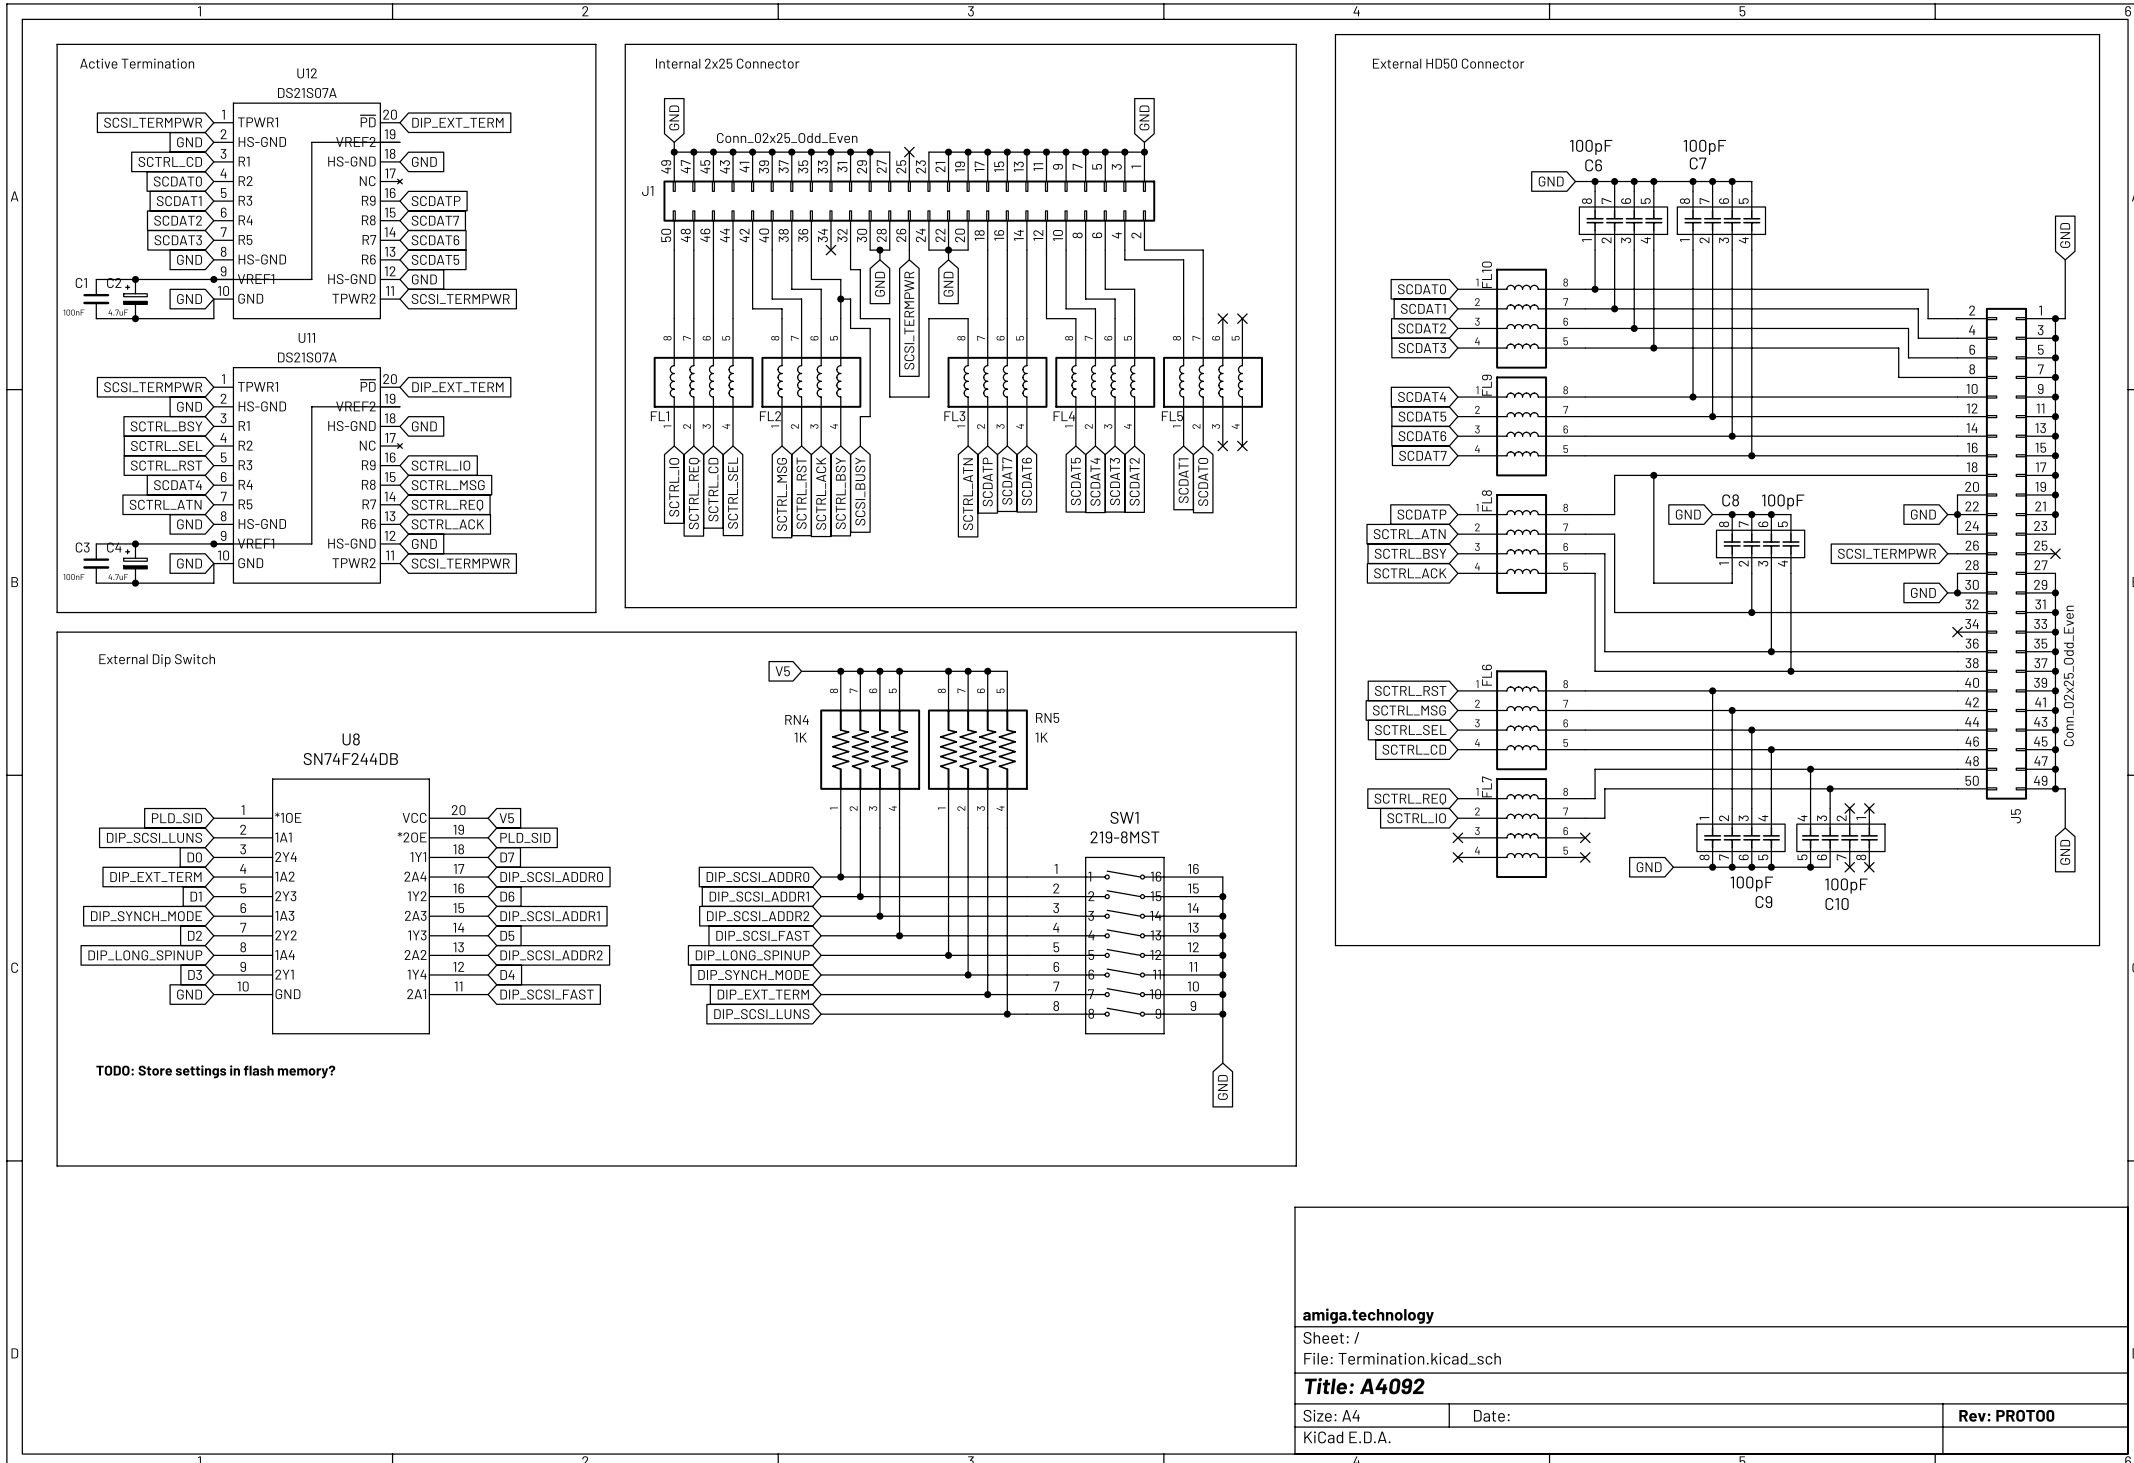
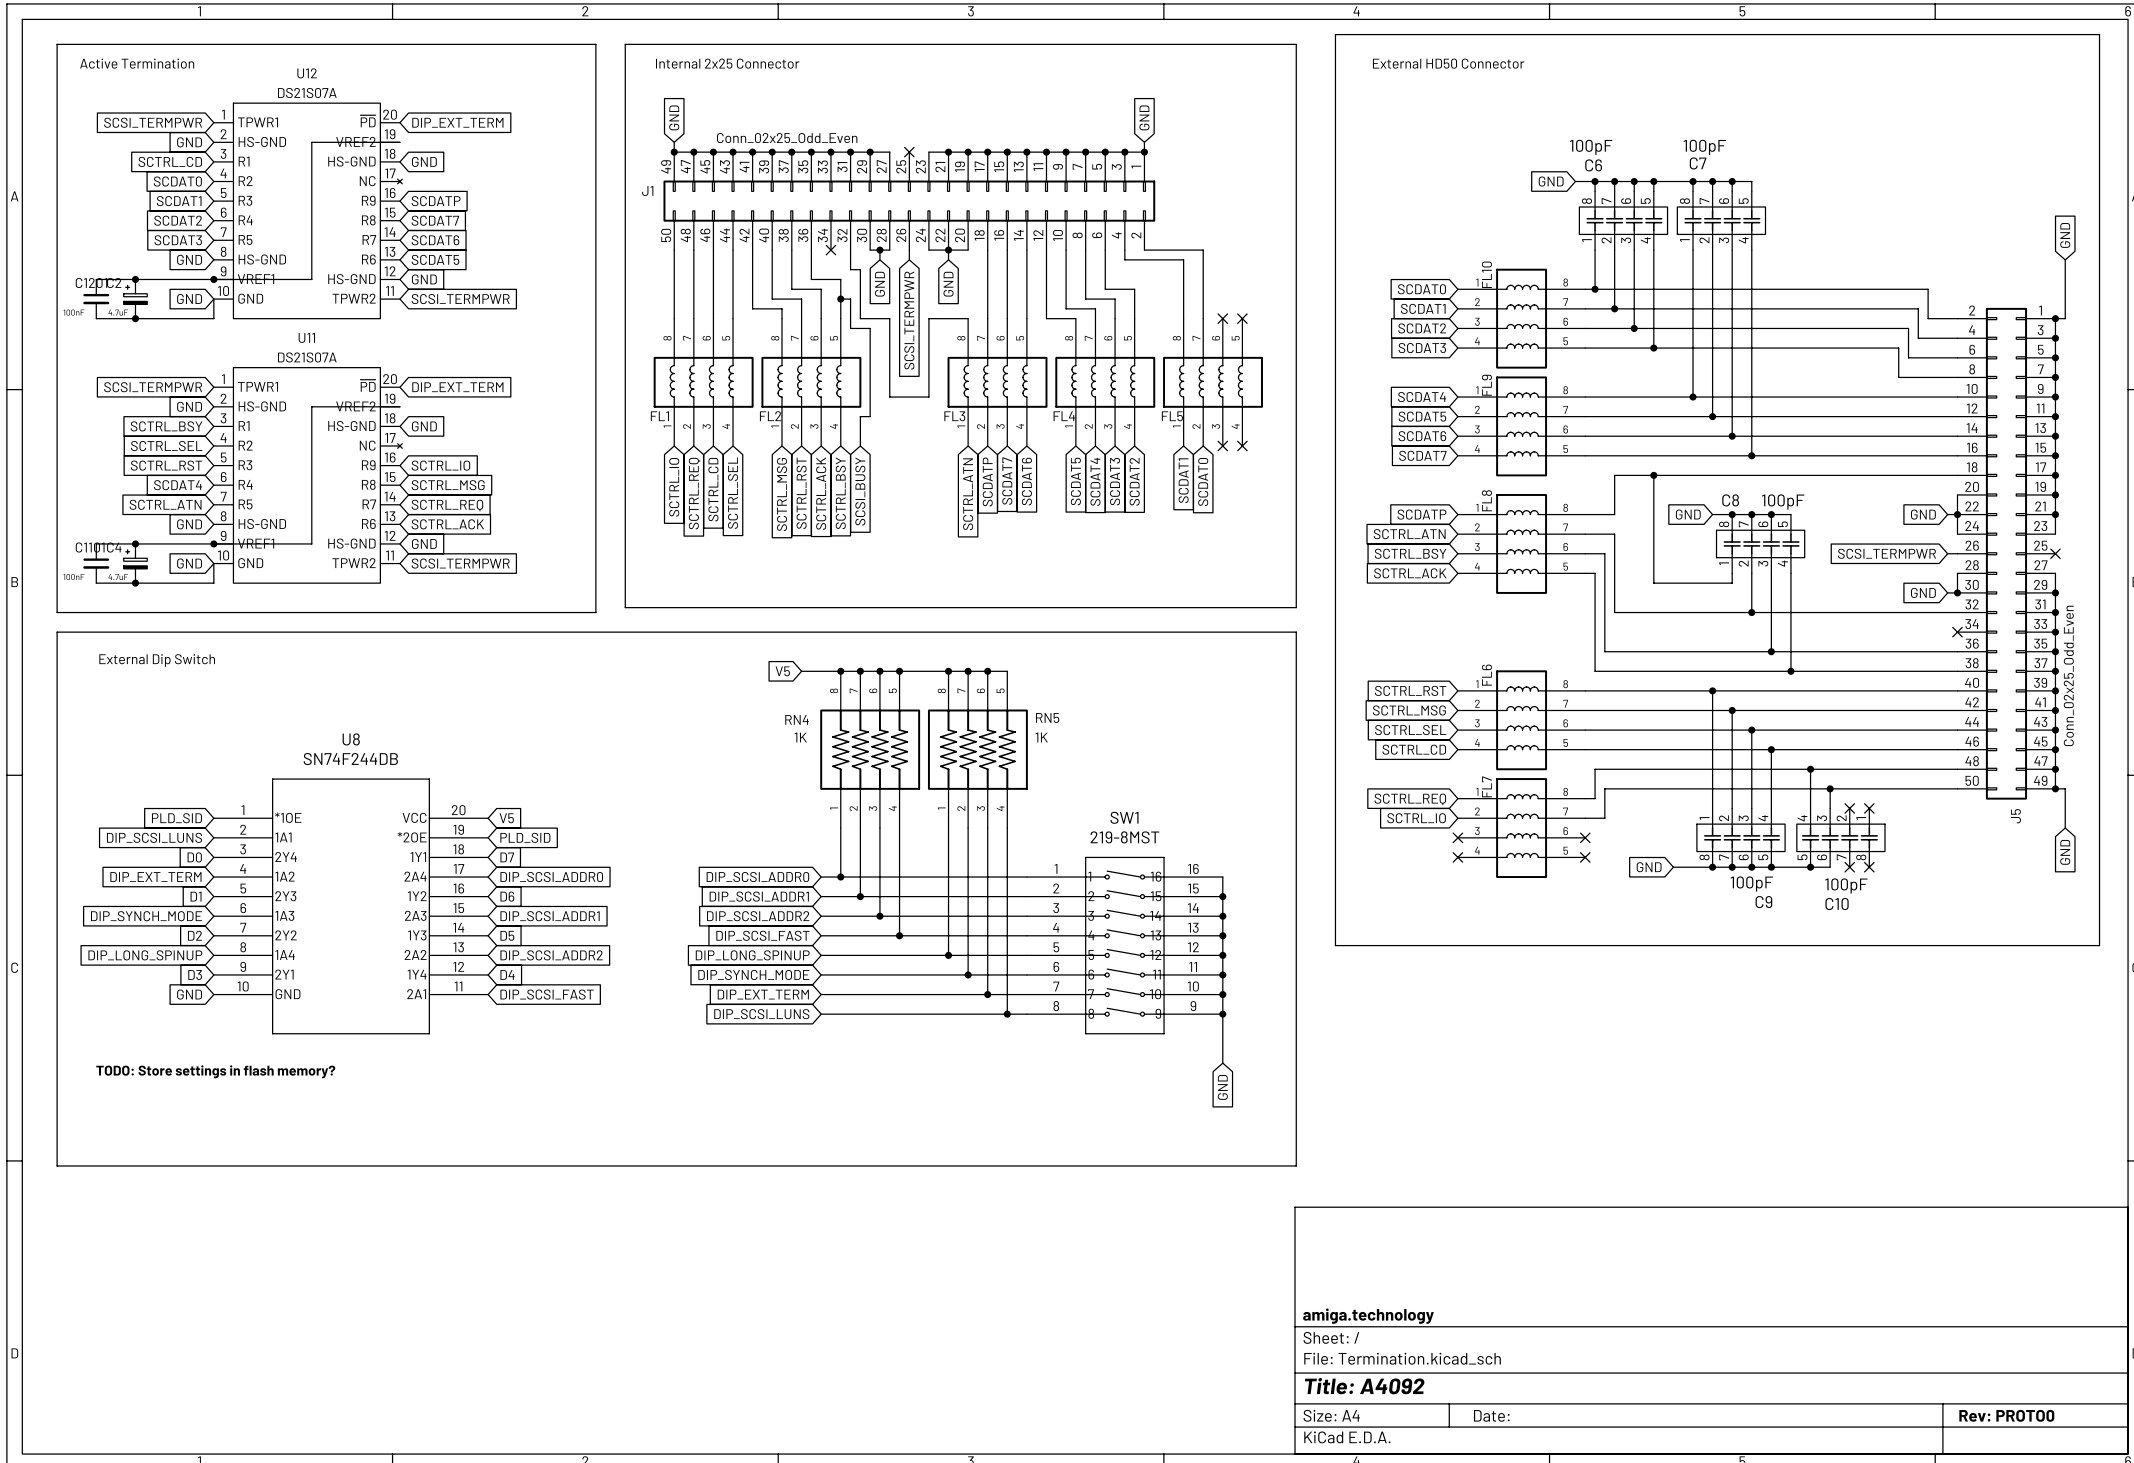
C1 name: C1 (81, 283) -> C1201 (91, 283)
C3 name: C3 (82, 547) -> C1101 (90, 547)

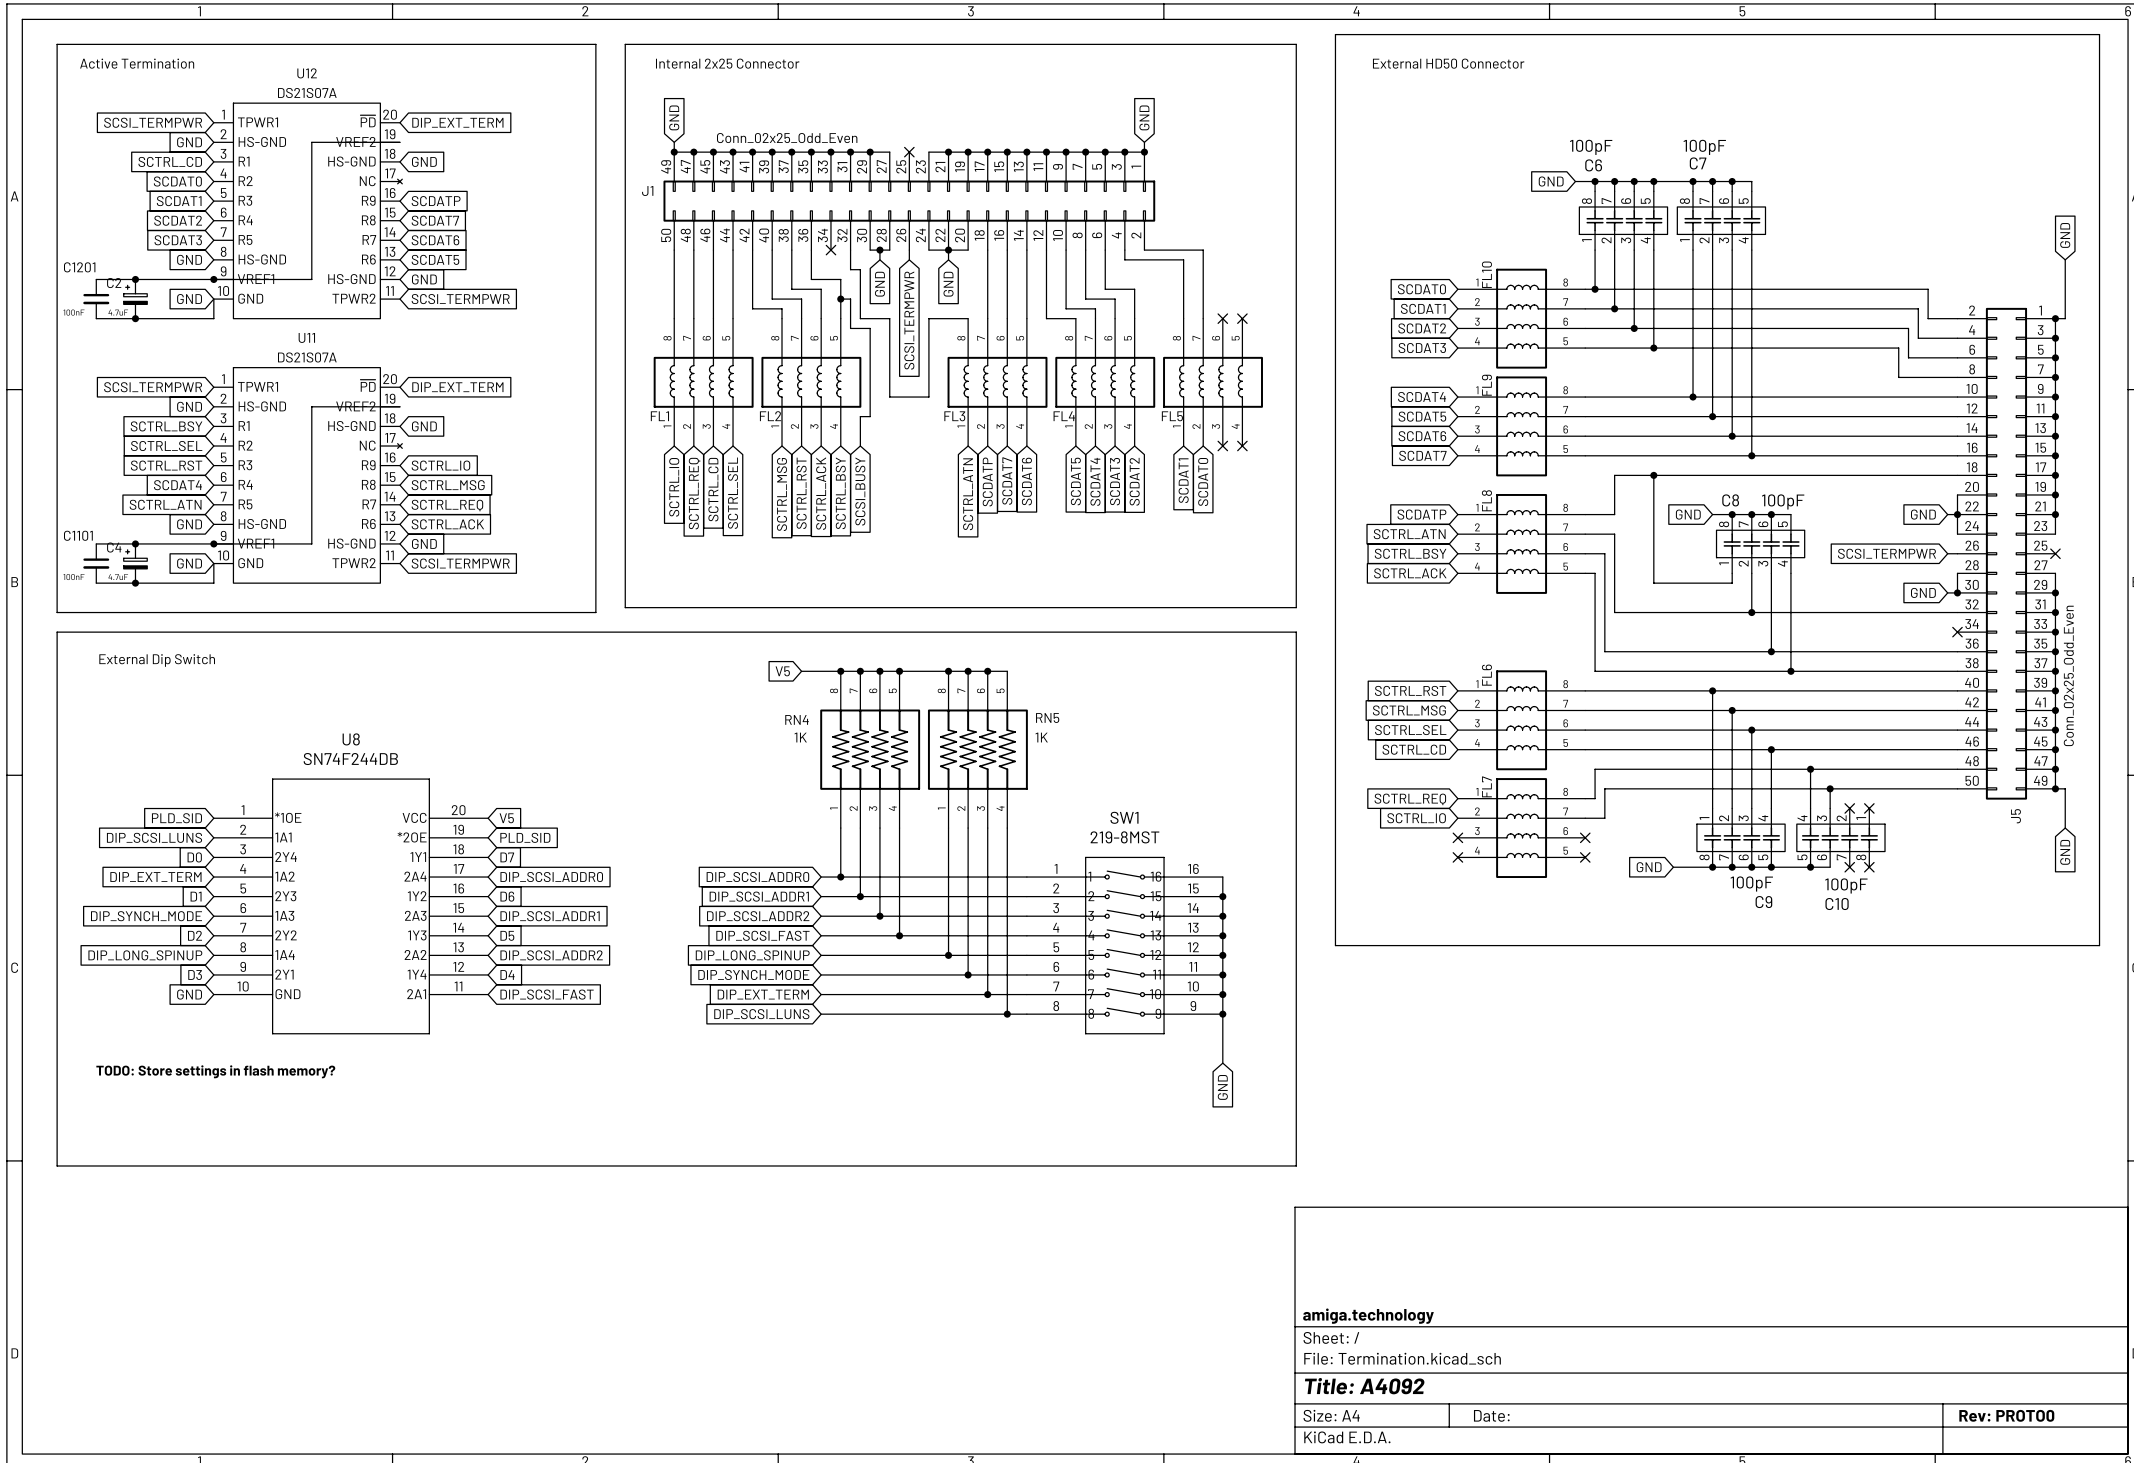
C1201 name position: C1201 (91, 283) -> C1201 (79, 267)
C1101 name position: C1101 (90, 547) -> C1101 (78, 535)

